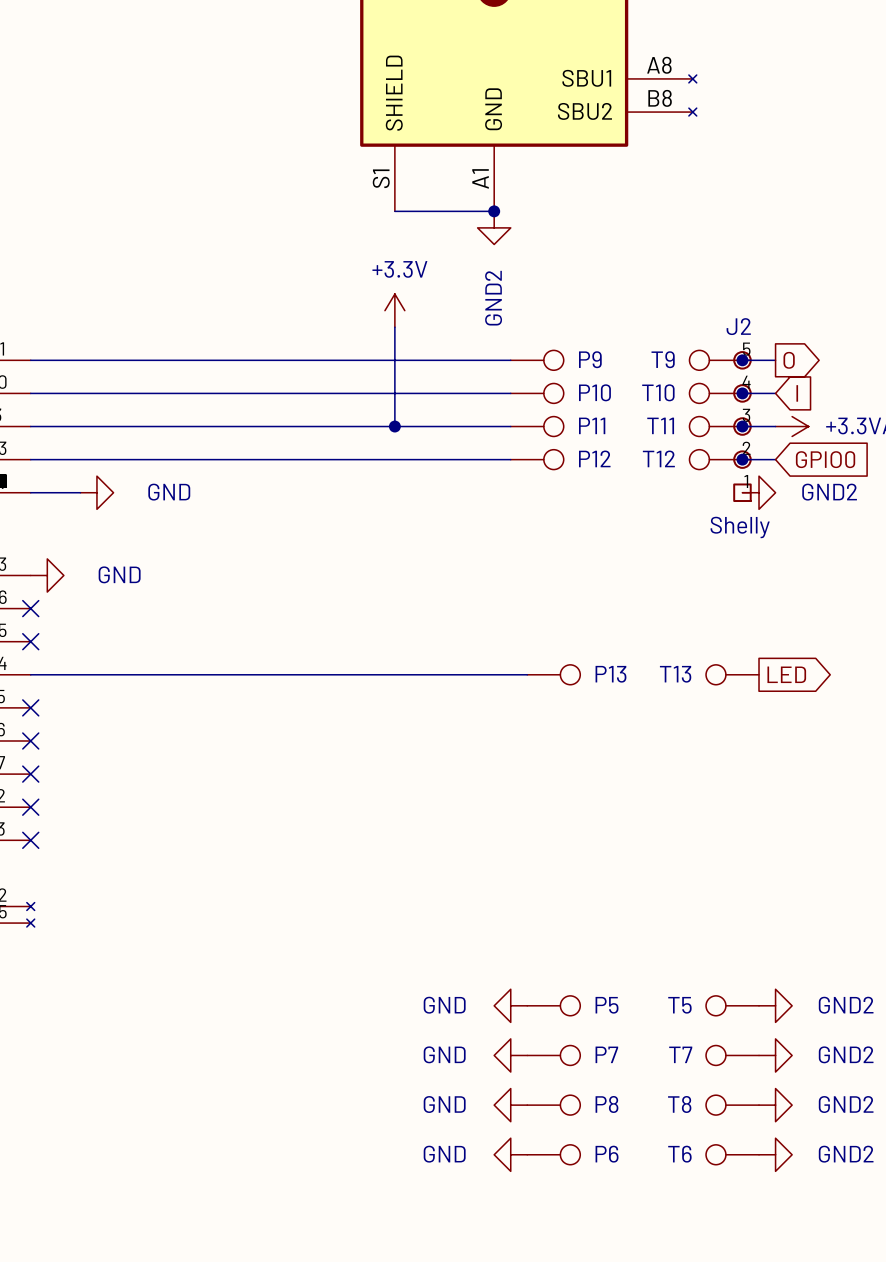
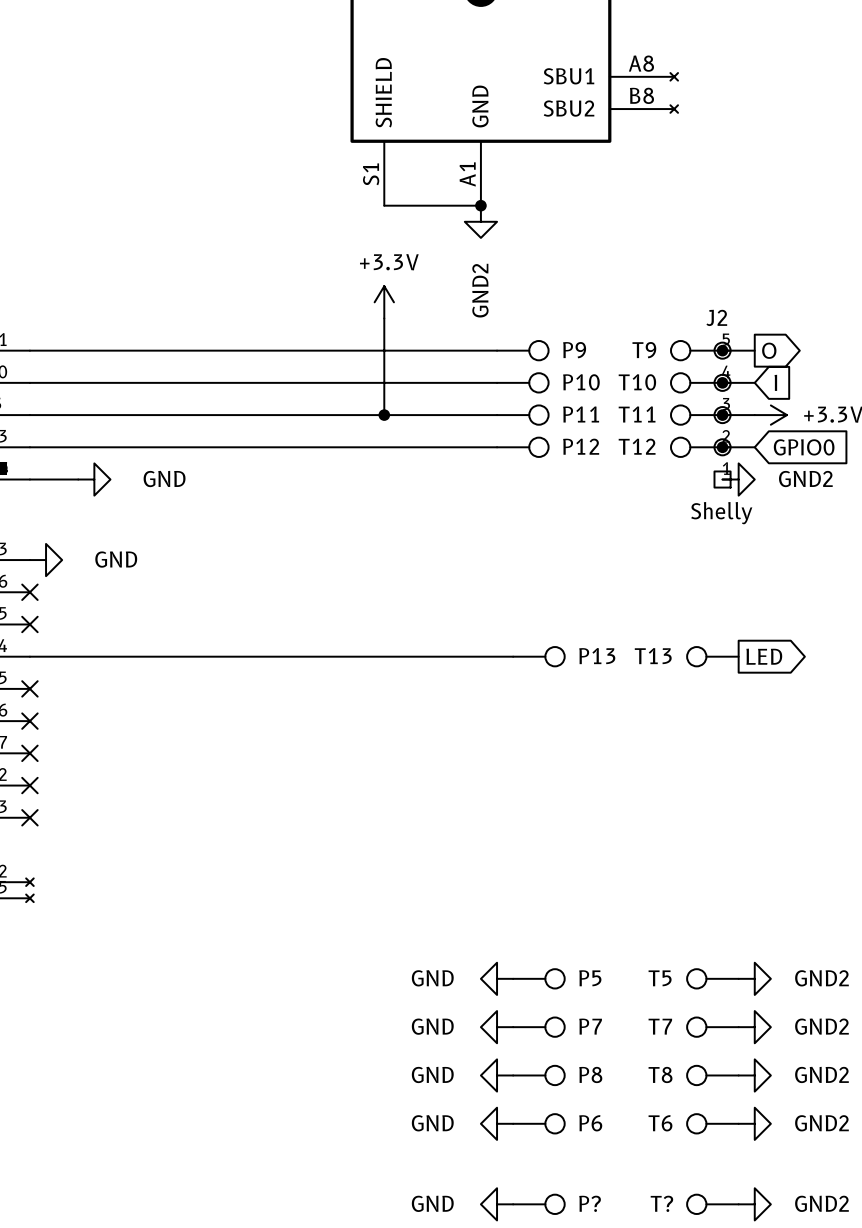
power symbol: none -> GND (497, 1204)
P?: none -> (538, 1204)
T?: none -> (712, 1204)
power symbol: none -> GND2 (754, 1204)

